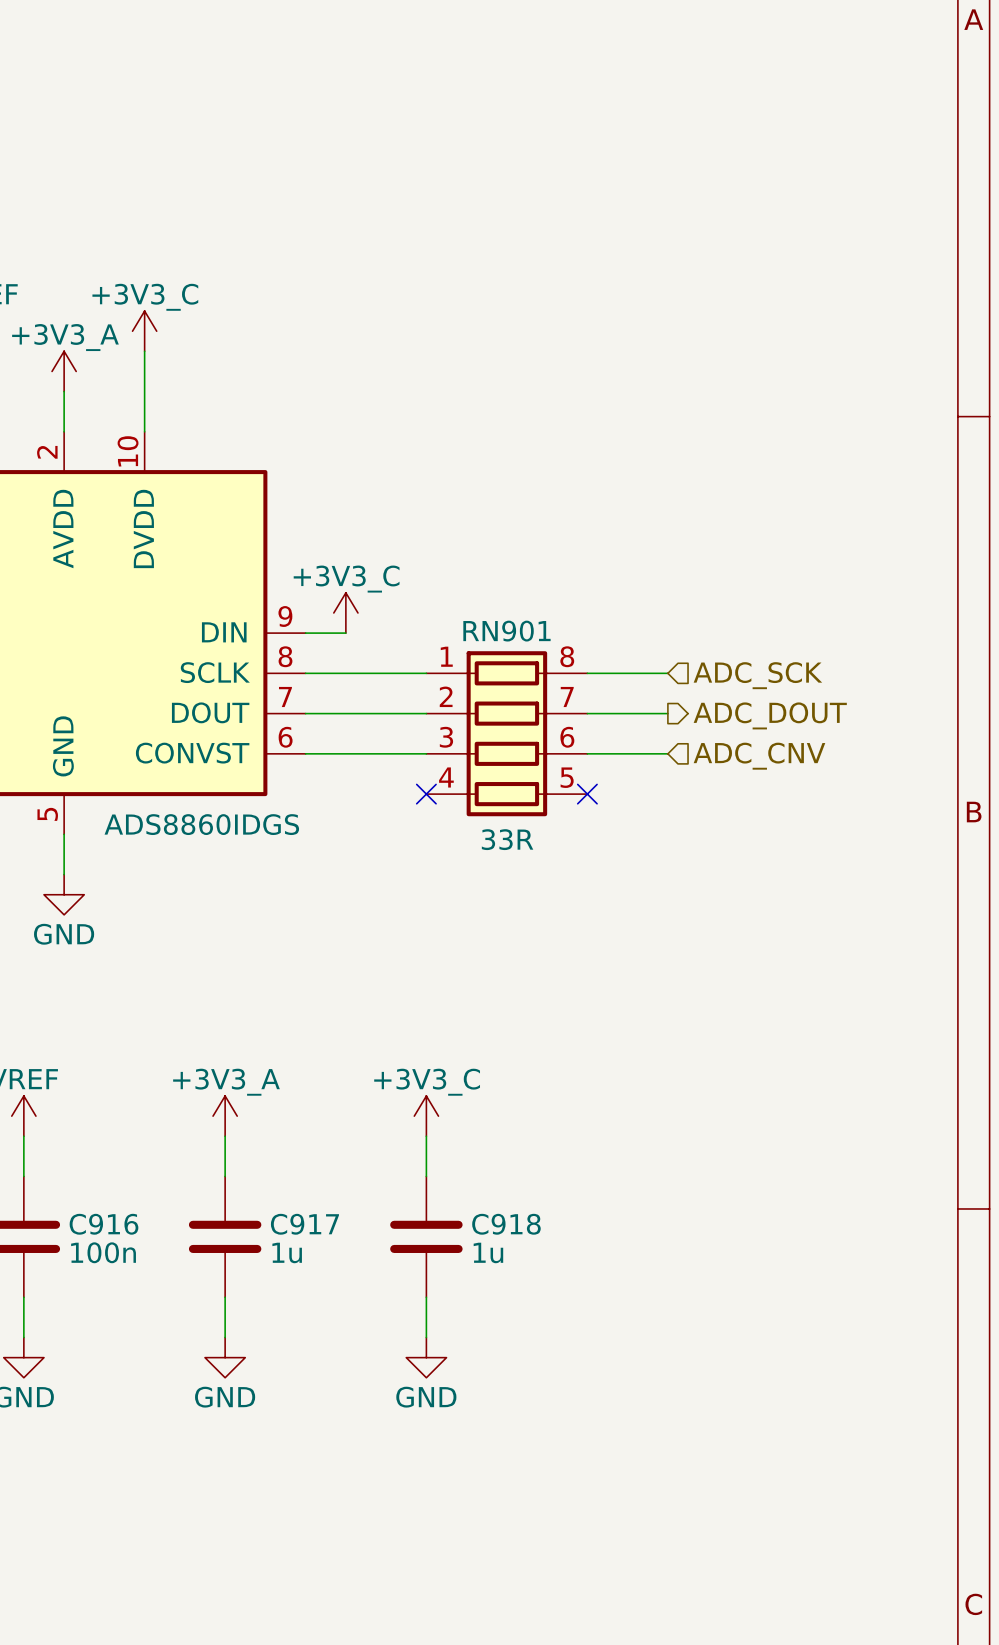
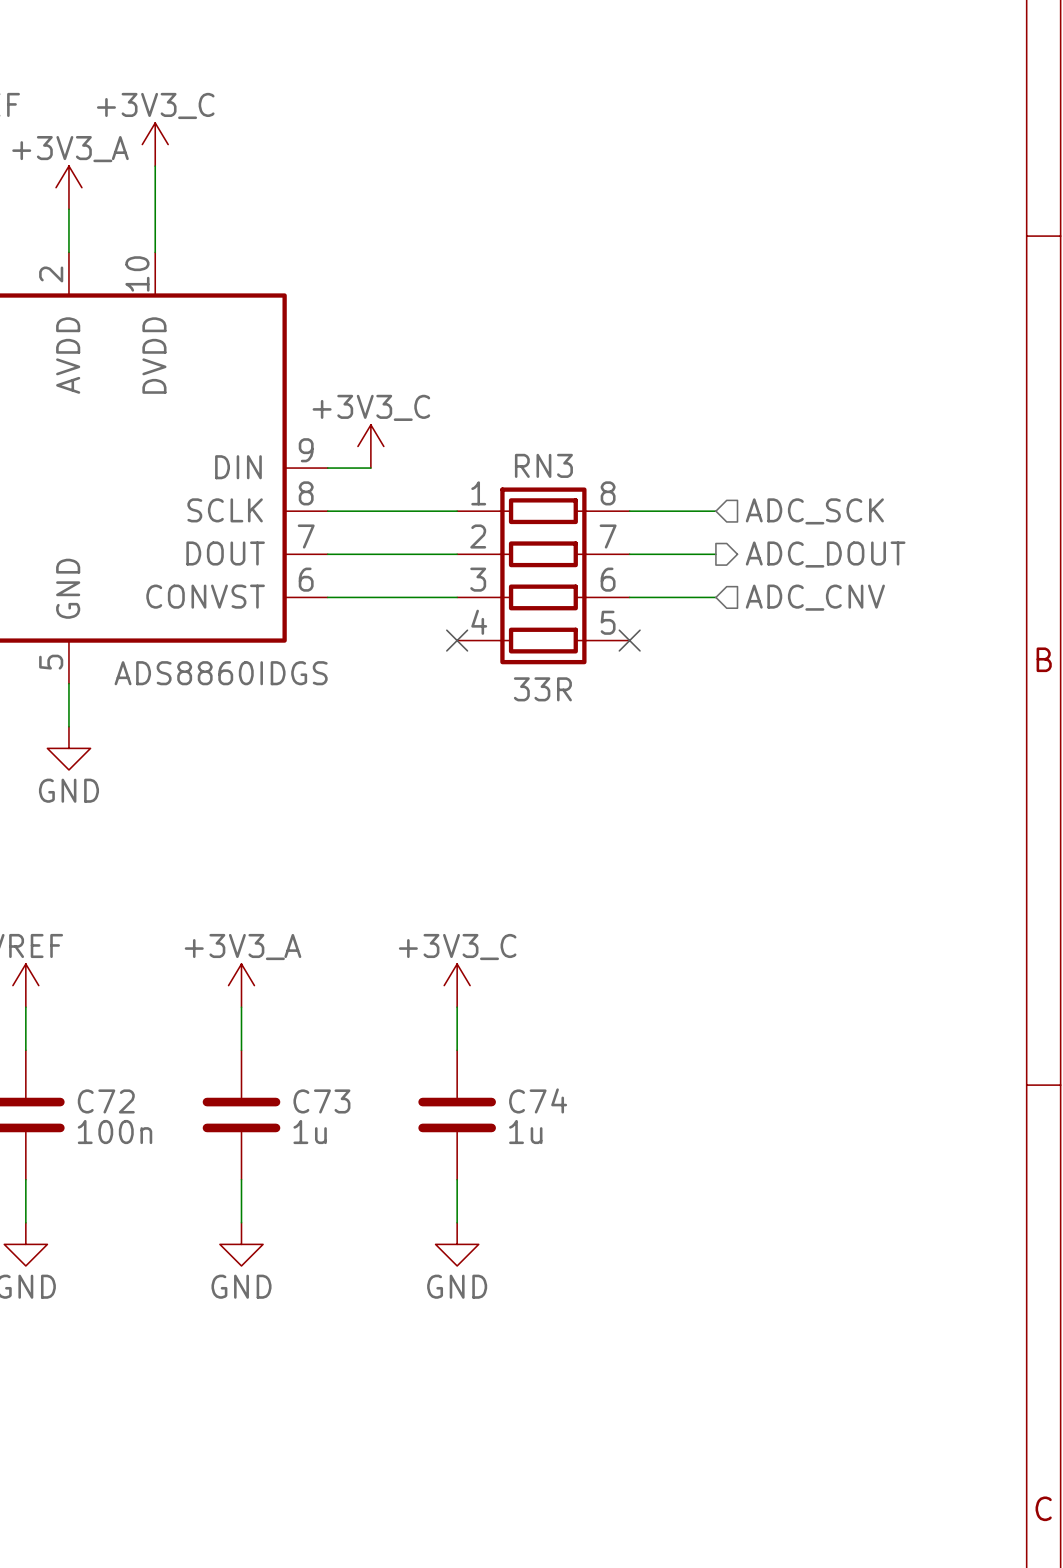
RN901 name: RN901 (506, 631) -> RN3 (543, 465)
C916 name: C916 (104, 1224) -> C72 (106, 1101)
C917 name: C917 (304, 1224) -> C73 (321, 1101)
C918 name: C918 (506, 1224) -> C74 (538, 1100)

